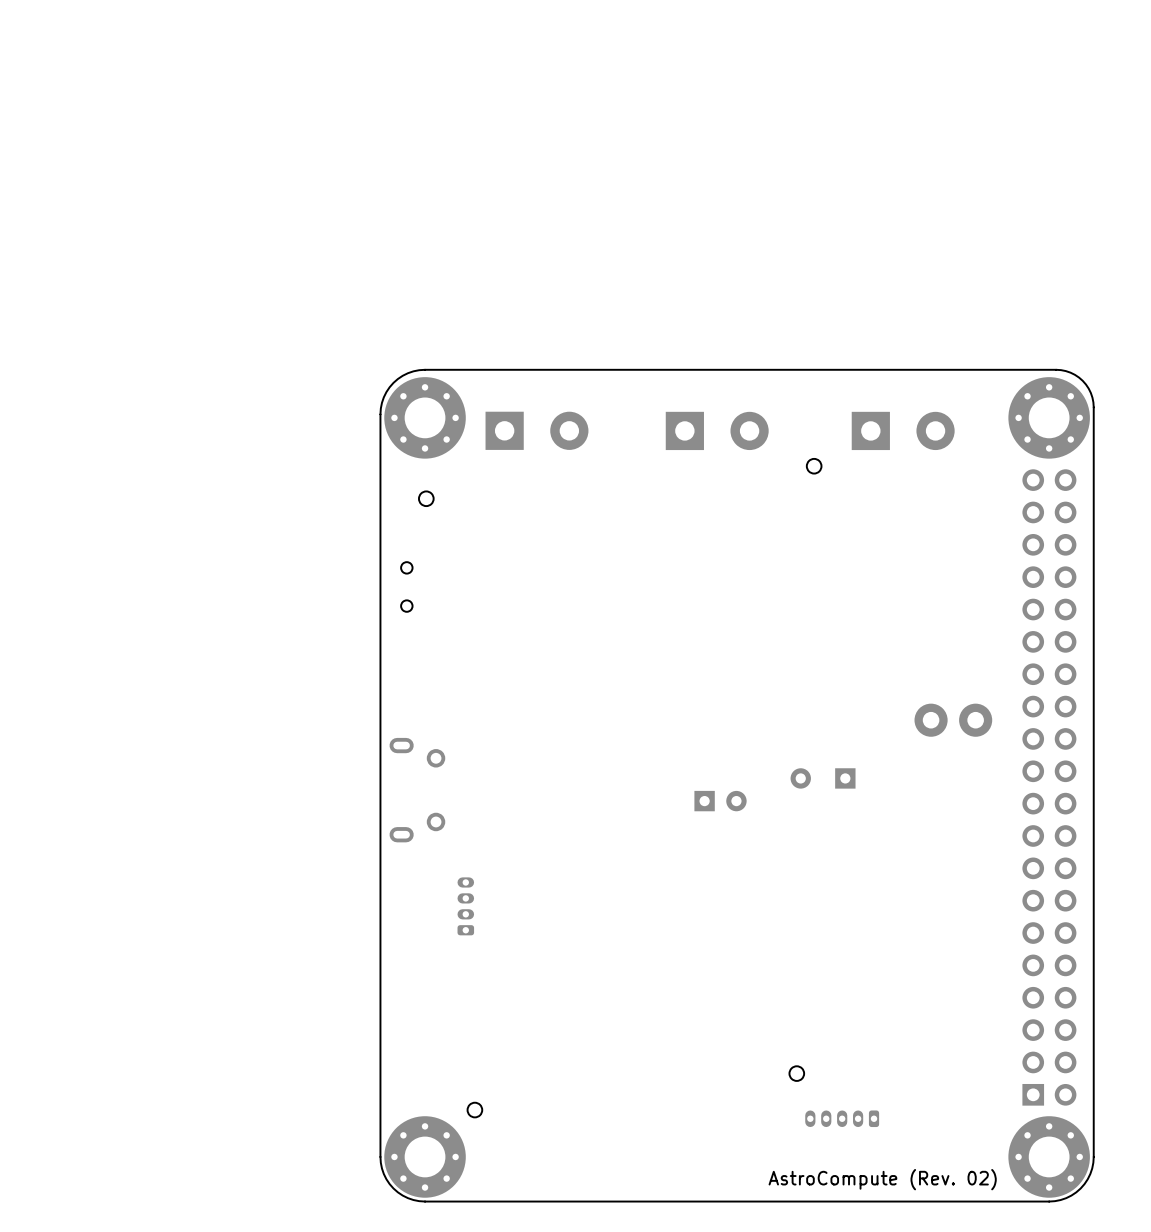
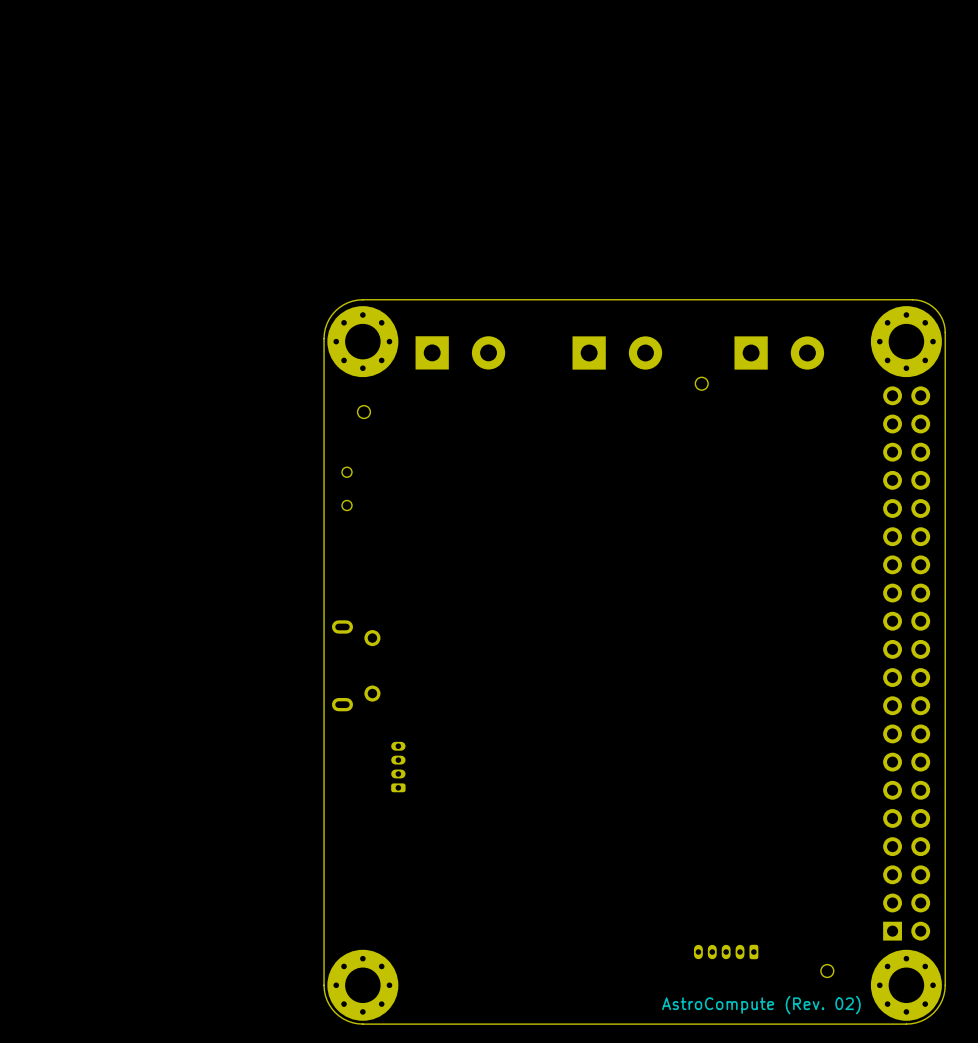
part: (953, 720) -> none
part: (823, 778) -> none
part: (720, 801) -> none
round board edge position: (796, 1073) -> (827, 971)
round board edge: [467, 1102, 483, 1118] -> none

